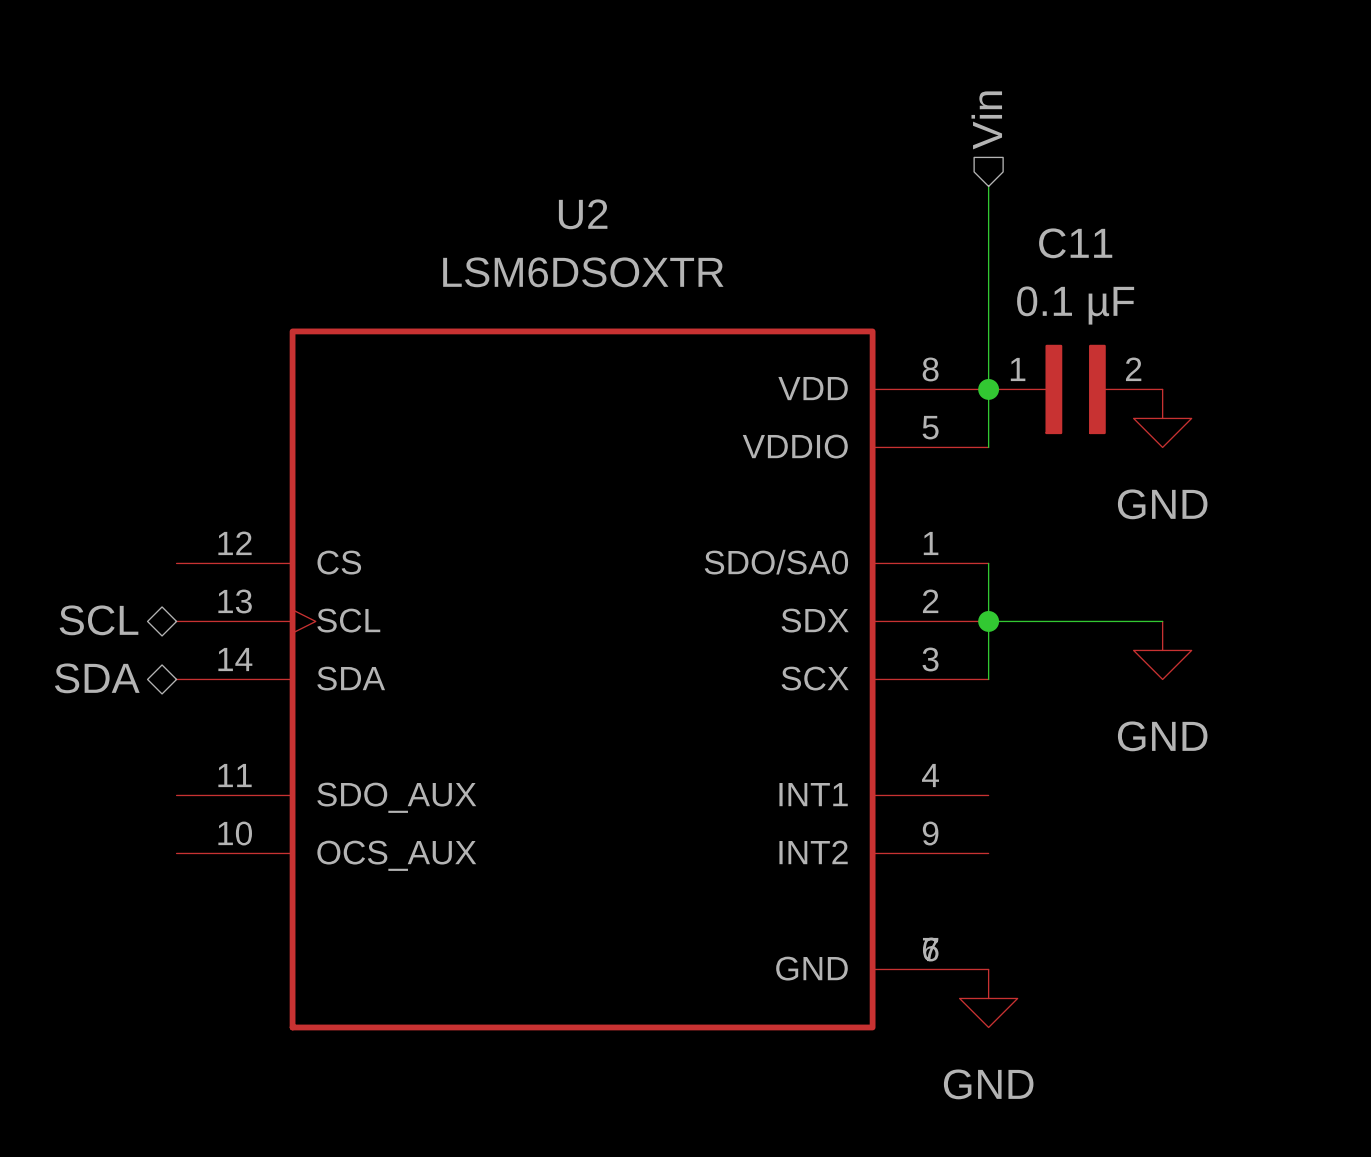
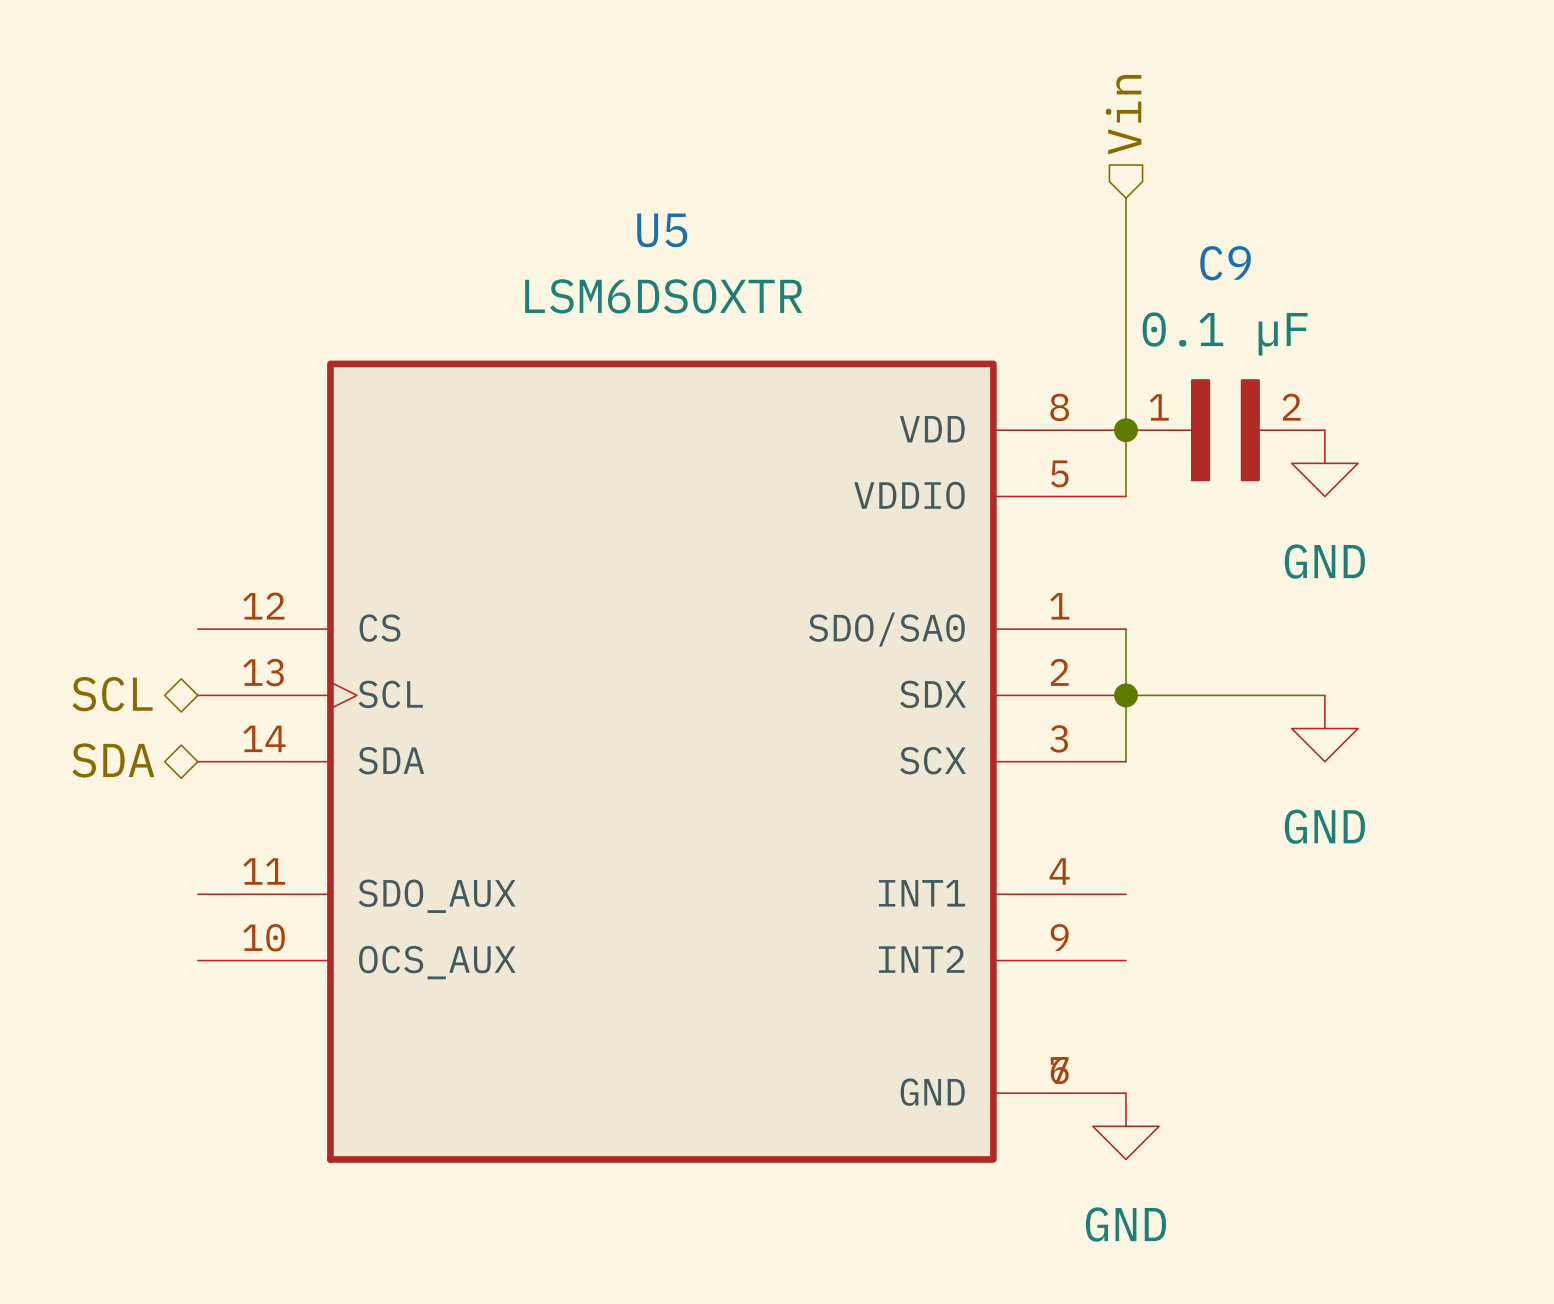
U2 name: U2 (583, 214) -> U5 (662, 230)
C11 name: C11 (1075, 243) -> C9 (1225, 263)

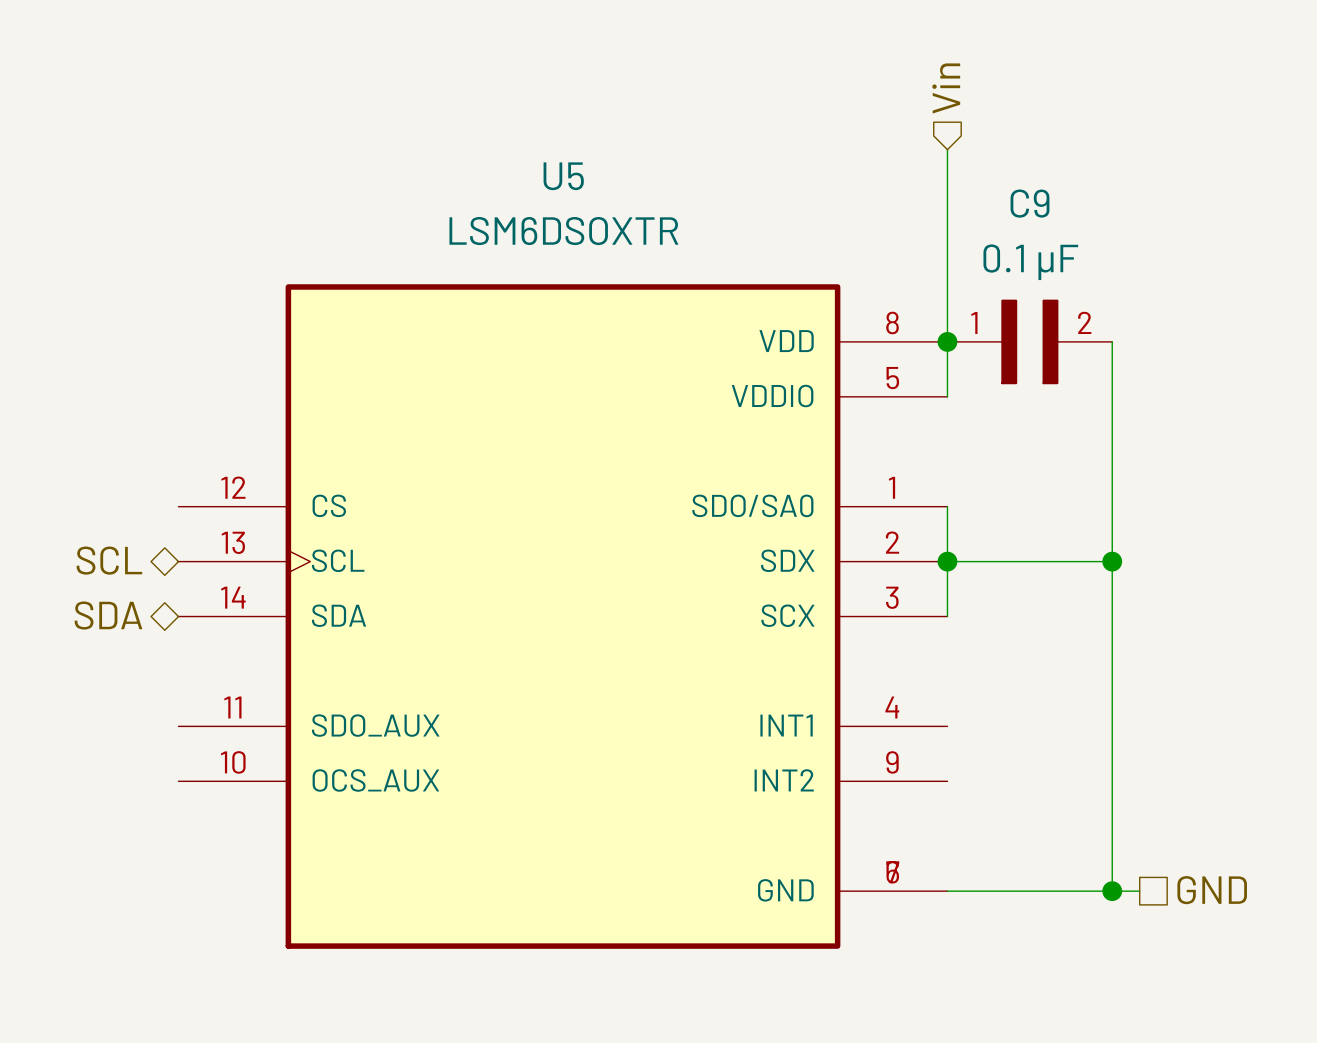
wire: none -> (1112, 341) (1112, 891)
power symbol: GND (1324, 463) -> none
junction: none -> (1112, 561)
power symbol: GND (1324, 728) -> none
hierarchical label: none -> GND (1212, 890)
wire: none -> (947, 891) (1139, 891)
junction: none -> (1112, 891)
power symbol: GND (1125, 1126) -> none

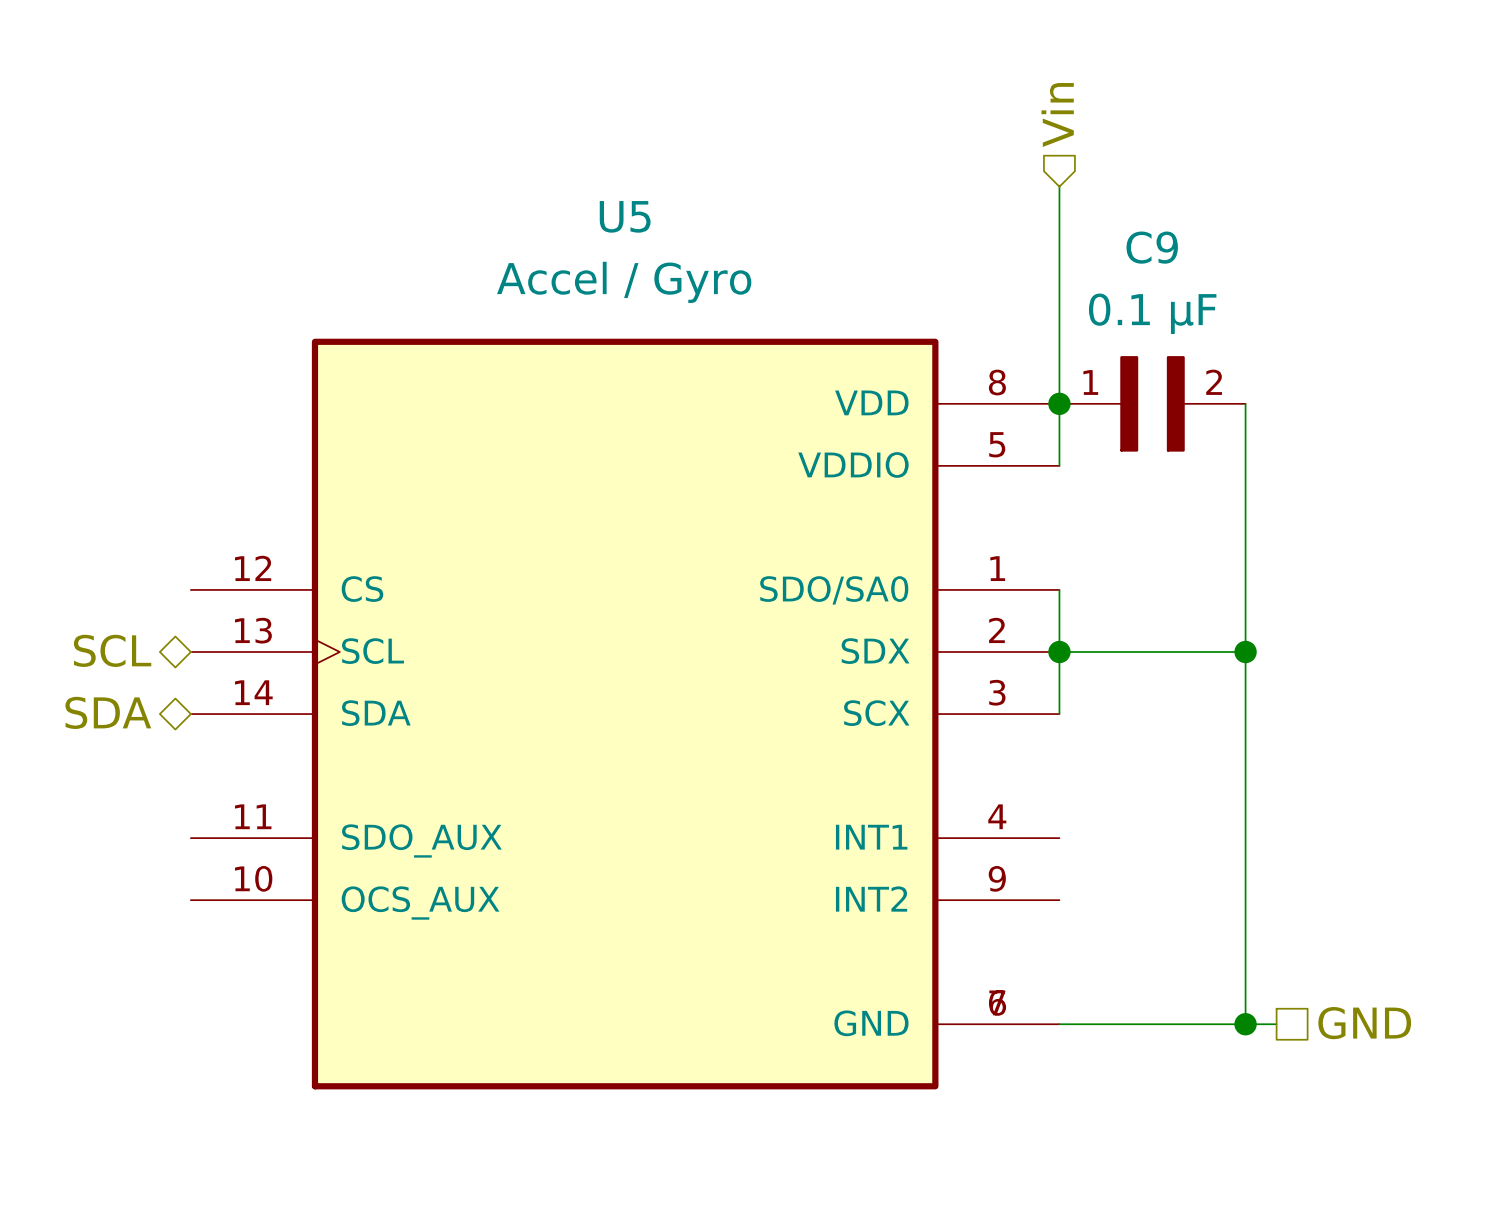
U5 value: LSM6DSOXTR (563, 231) -> Accel / Gyro (624, 282)

